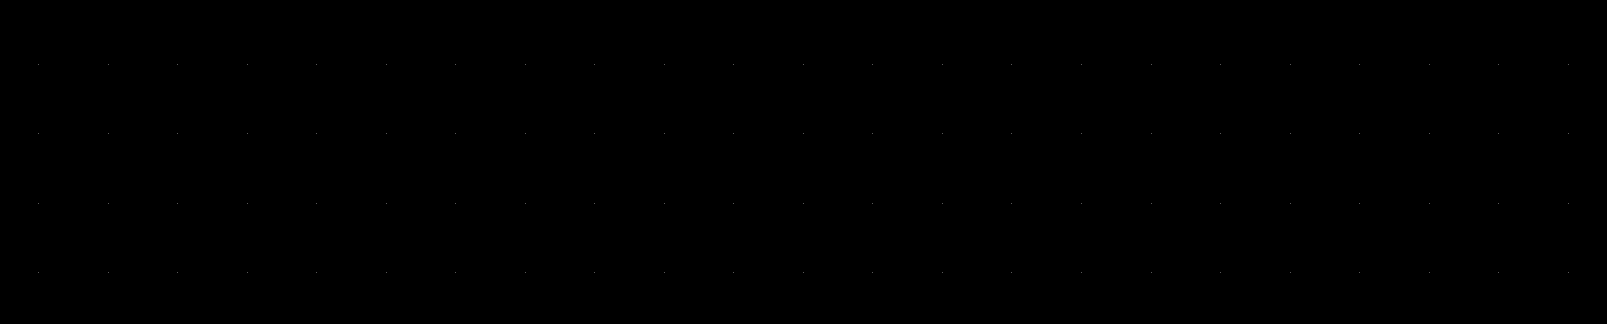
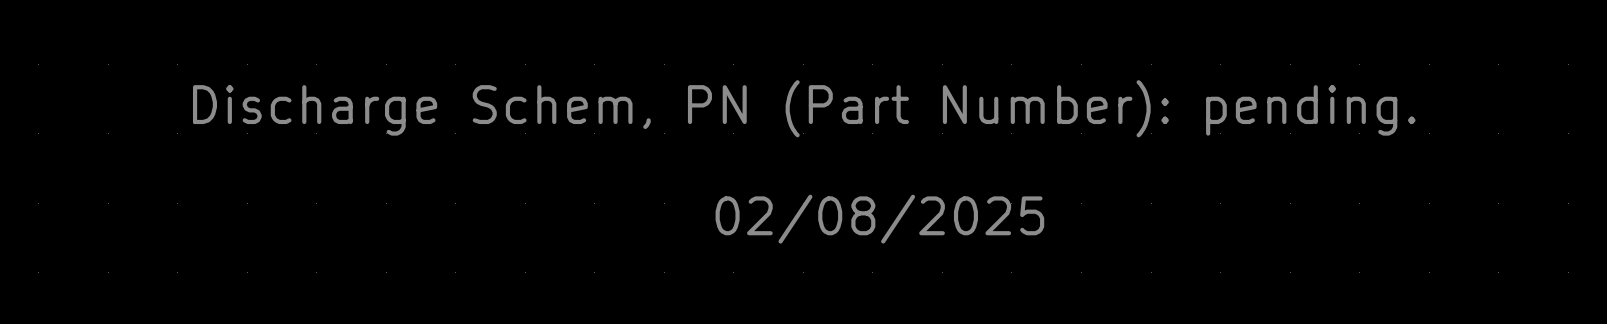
text: none -> Discharge Schem, PN (Part Number): pending. (804, 108)
text: none -> 02/08/2025 (879, 219)

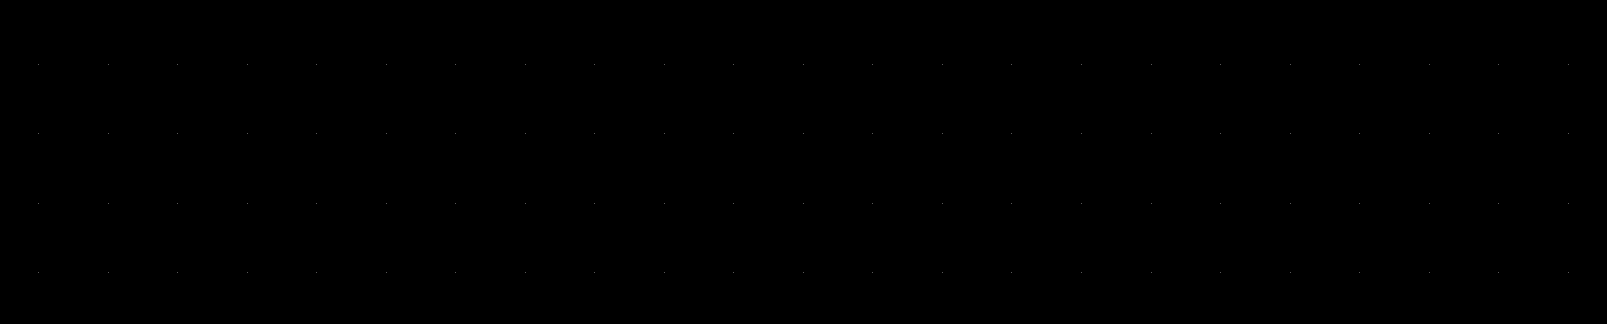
text: Discharge Schem, PN (Part Number): pending. (804, 108) -> none
text: 02/08/2025 (879, 219) -> none

